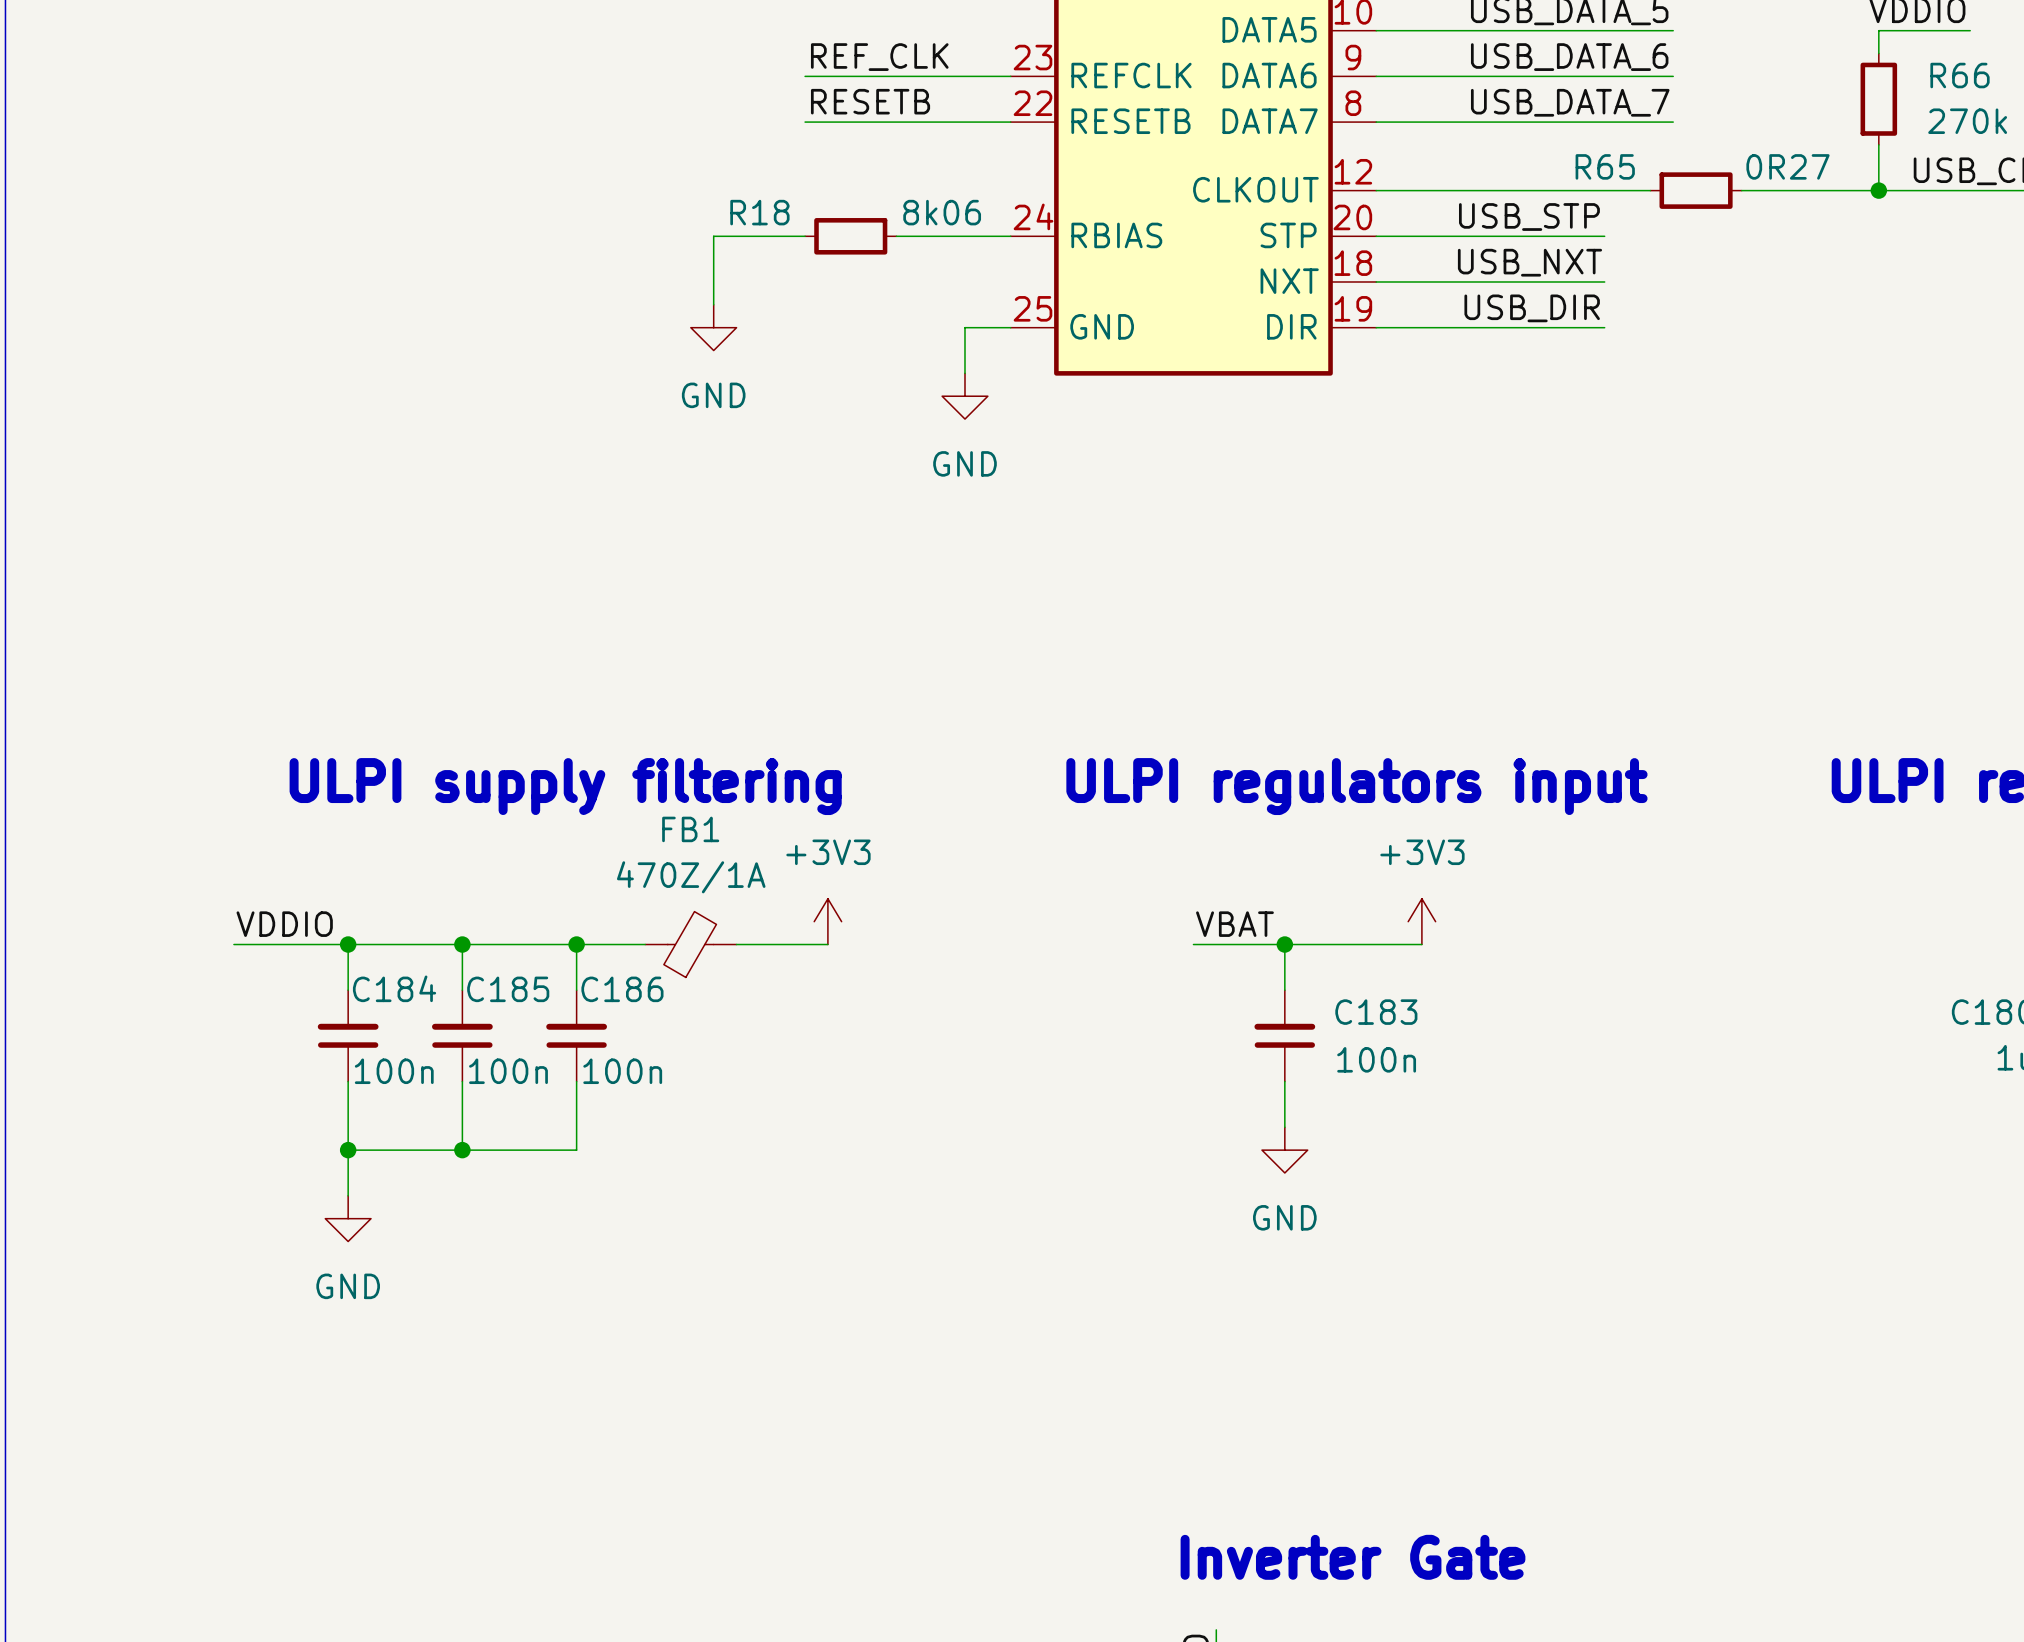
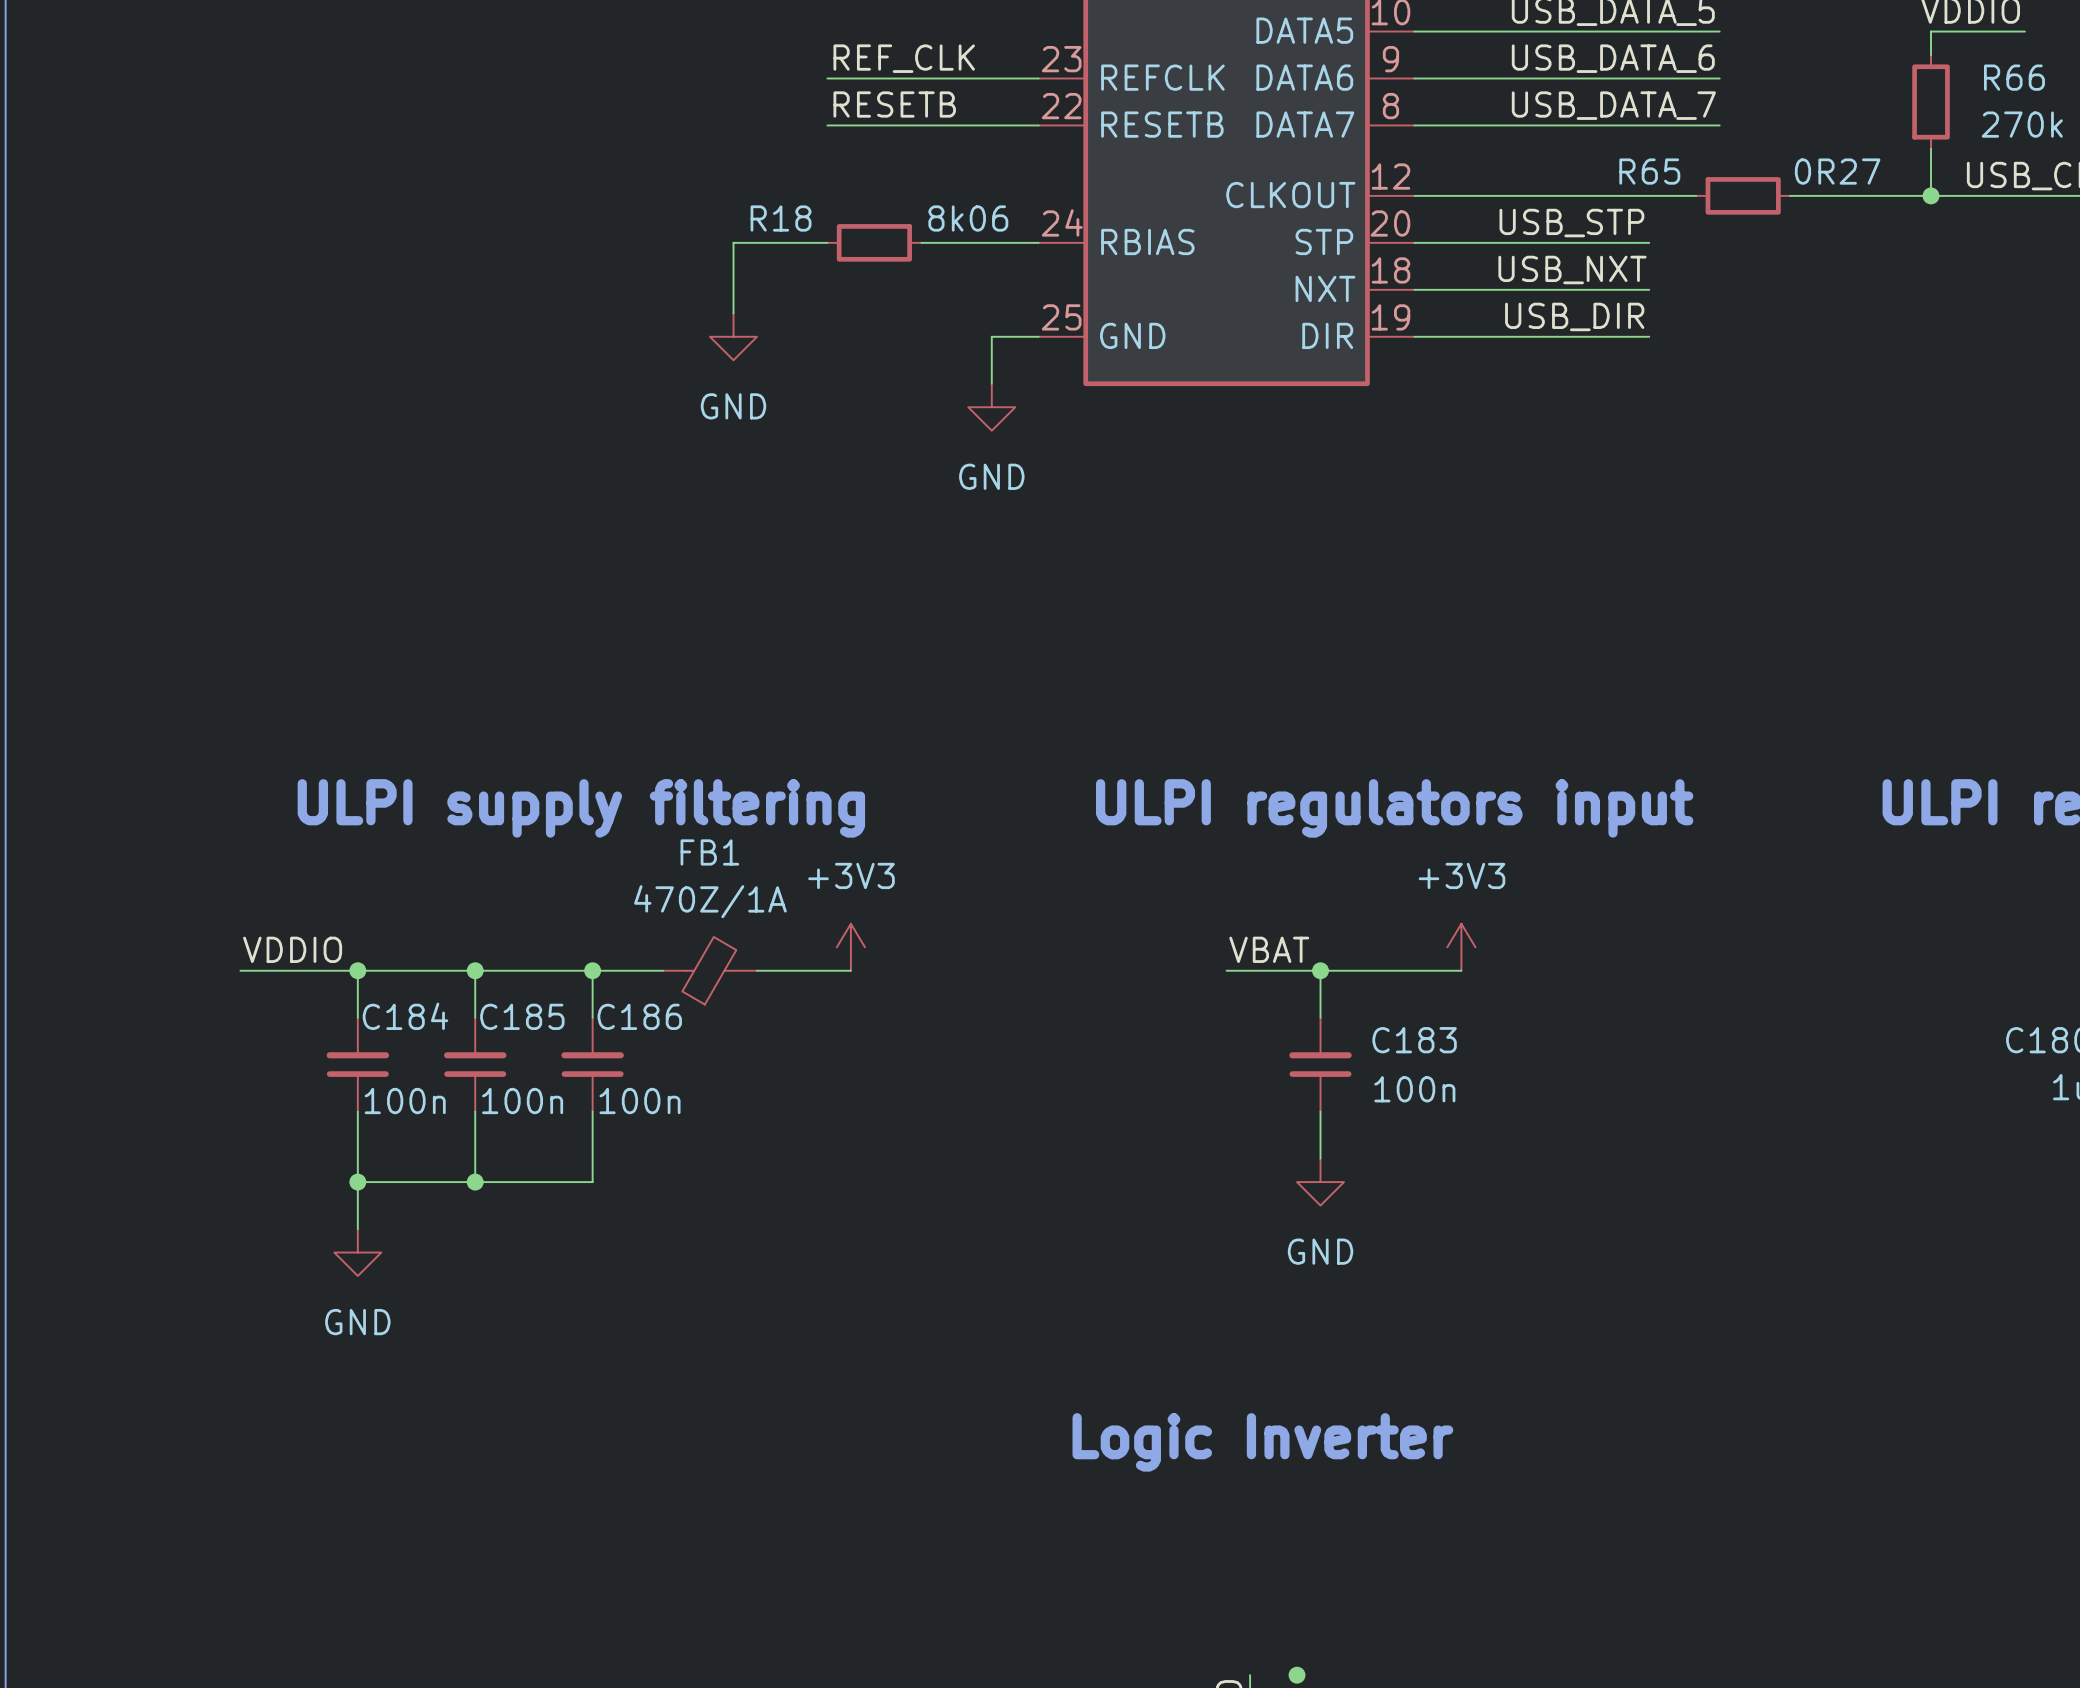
text: none -> Logic Inverter (1262, 1442)
text: Inverter Gate (1352, 1557) -> none
junction: none -> (1297, 1675)

